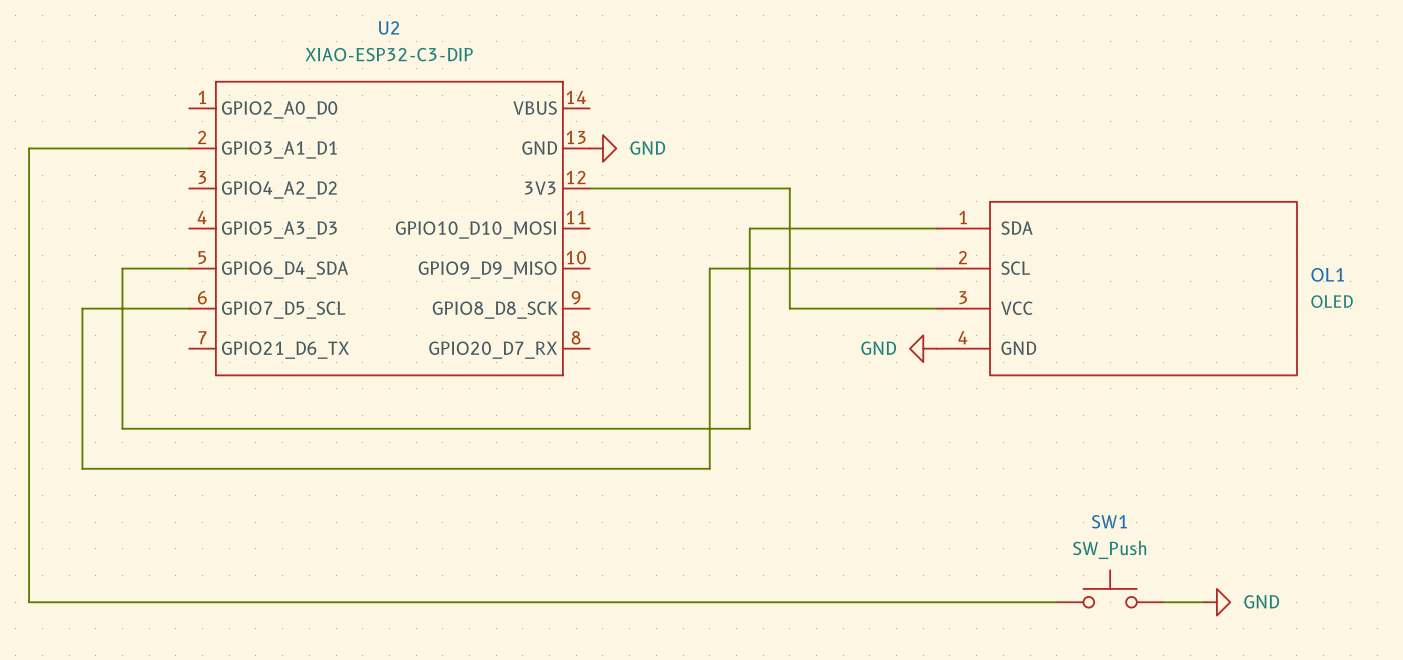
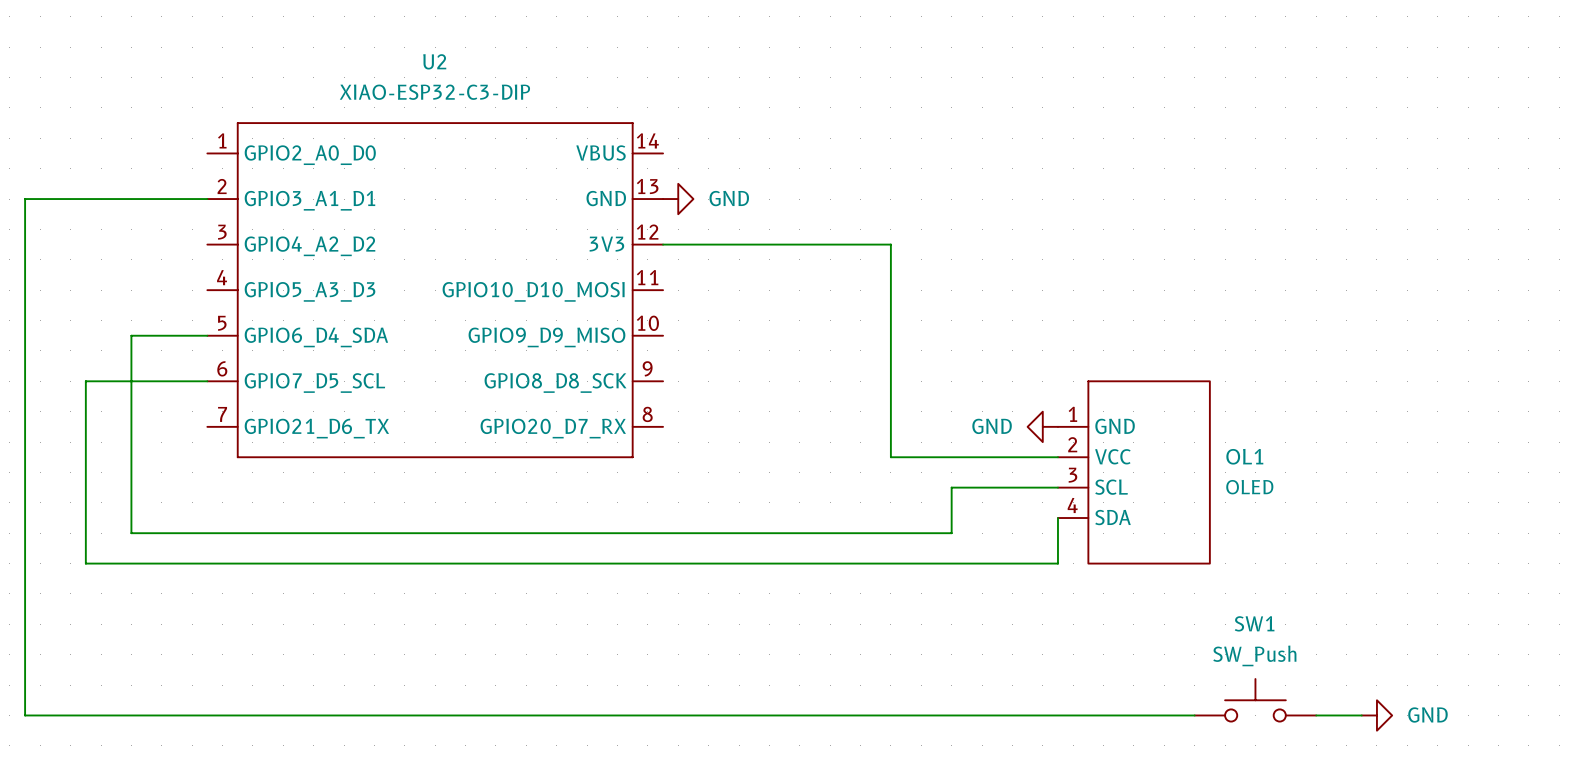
OL1 symbol: [936, 201, 1297, 376] -> [1057, 381, 1210, 564]
wire: (936, 228) (749, 228) (749, 428) (122, 428) -> (1057, 487) (951, 487) (951, 533) (131, 533) (131, 518)
wire: (936, 268) (709, 268) (709, 468) -> (1057, 518) (1057, 563) (799, 563)
OL1 name position: OL1 (1327, 274) -> OL1 (1244, 456)
OL1 value position: OLED (1332, 301) -> OLED (1249, 487)
wire: (789, 308) (936, 308) -> (890, 381) (890, 457) (1057, 457)

